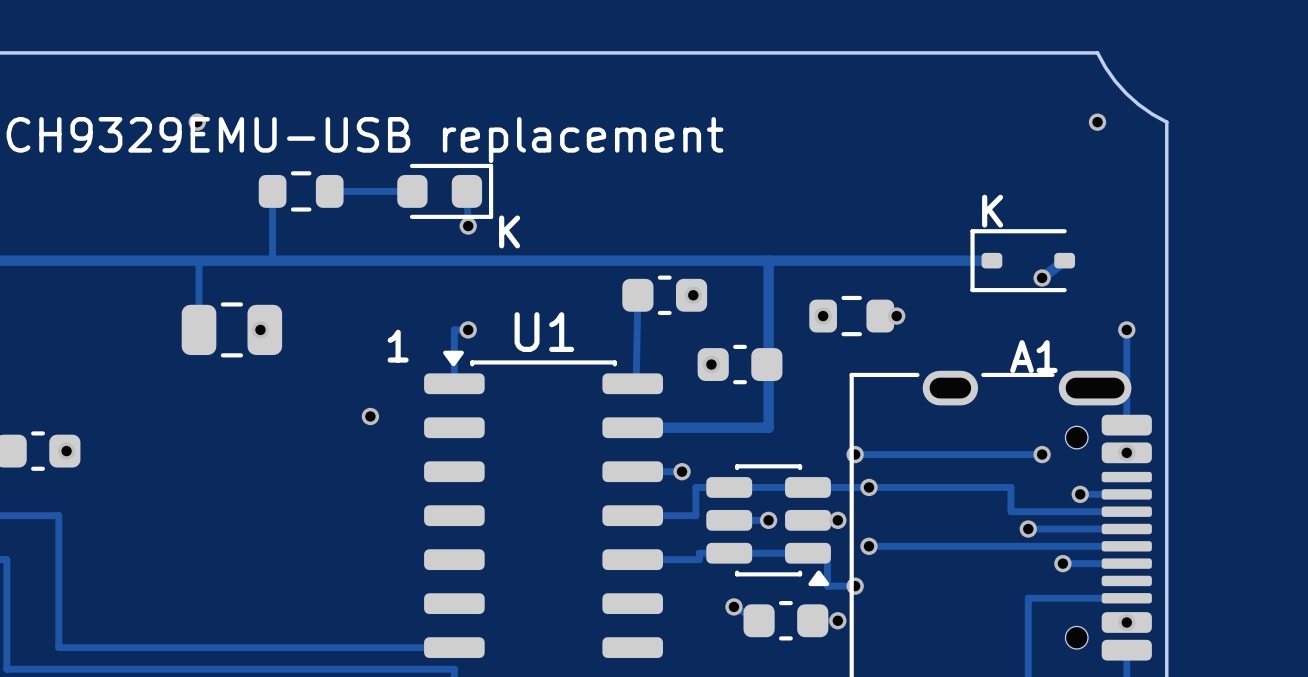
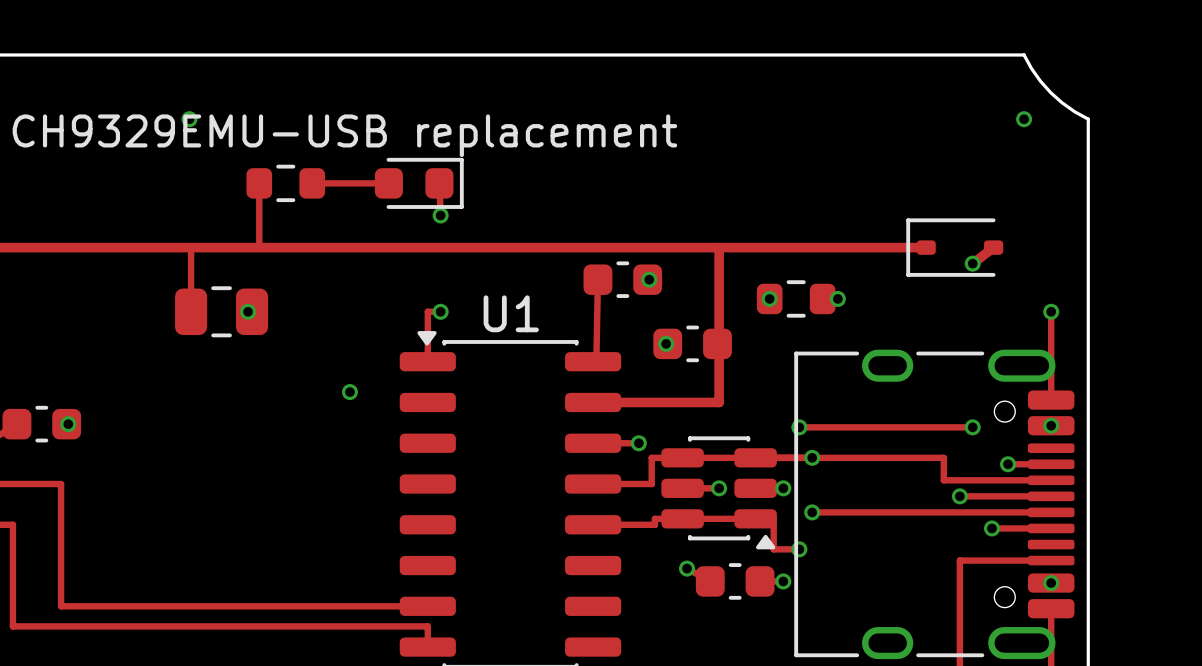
text: K (992, 211) -> none
text: K (509, 231) -> none
text: 1 (398, 346) -> none
text: A1 (1033, 356) -> none

